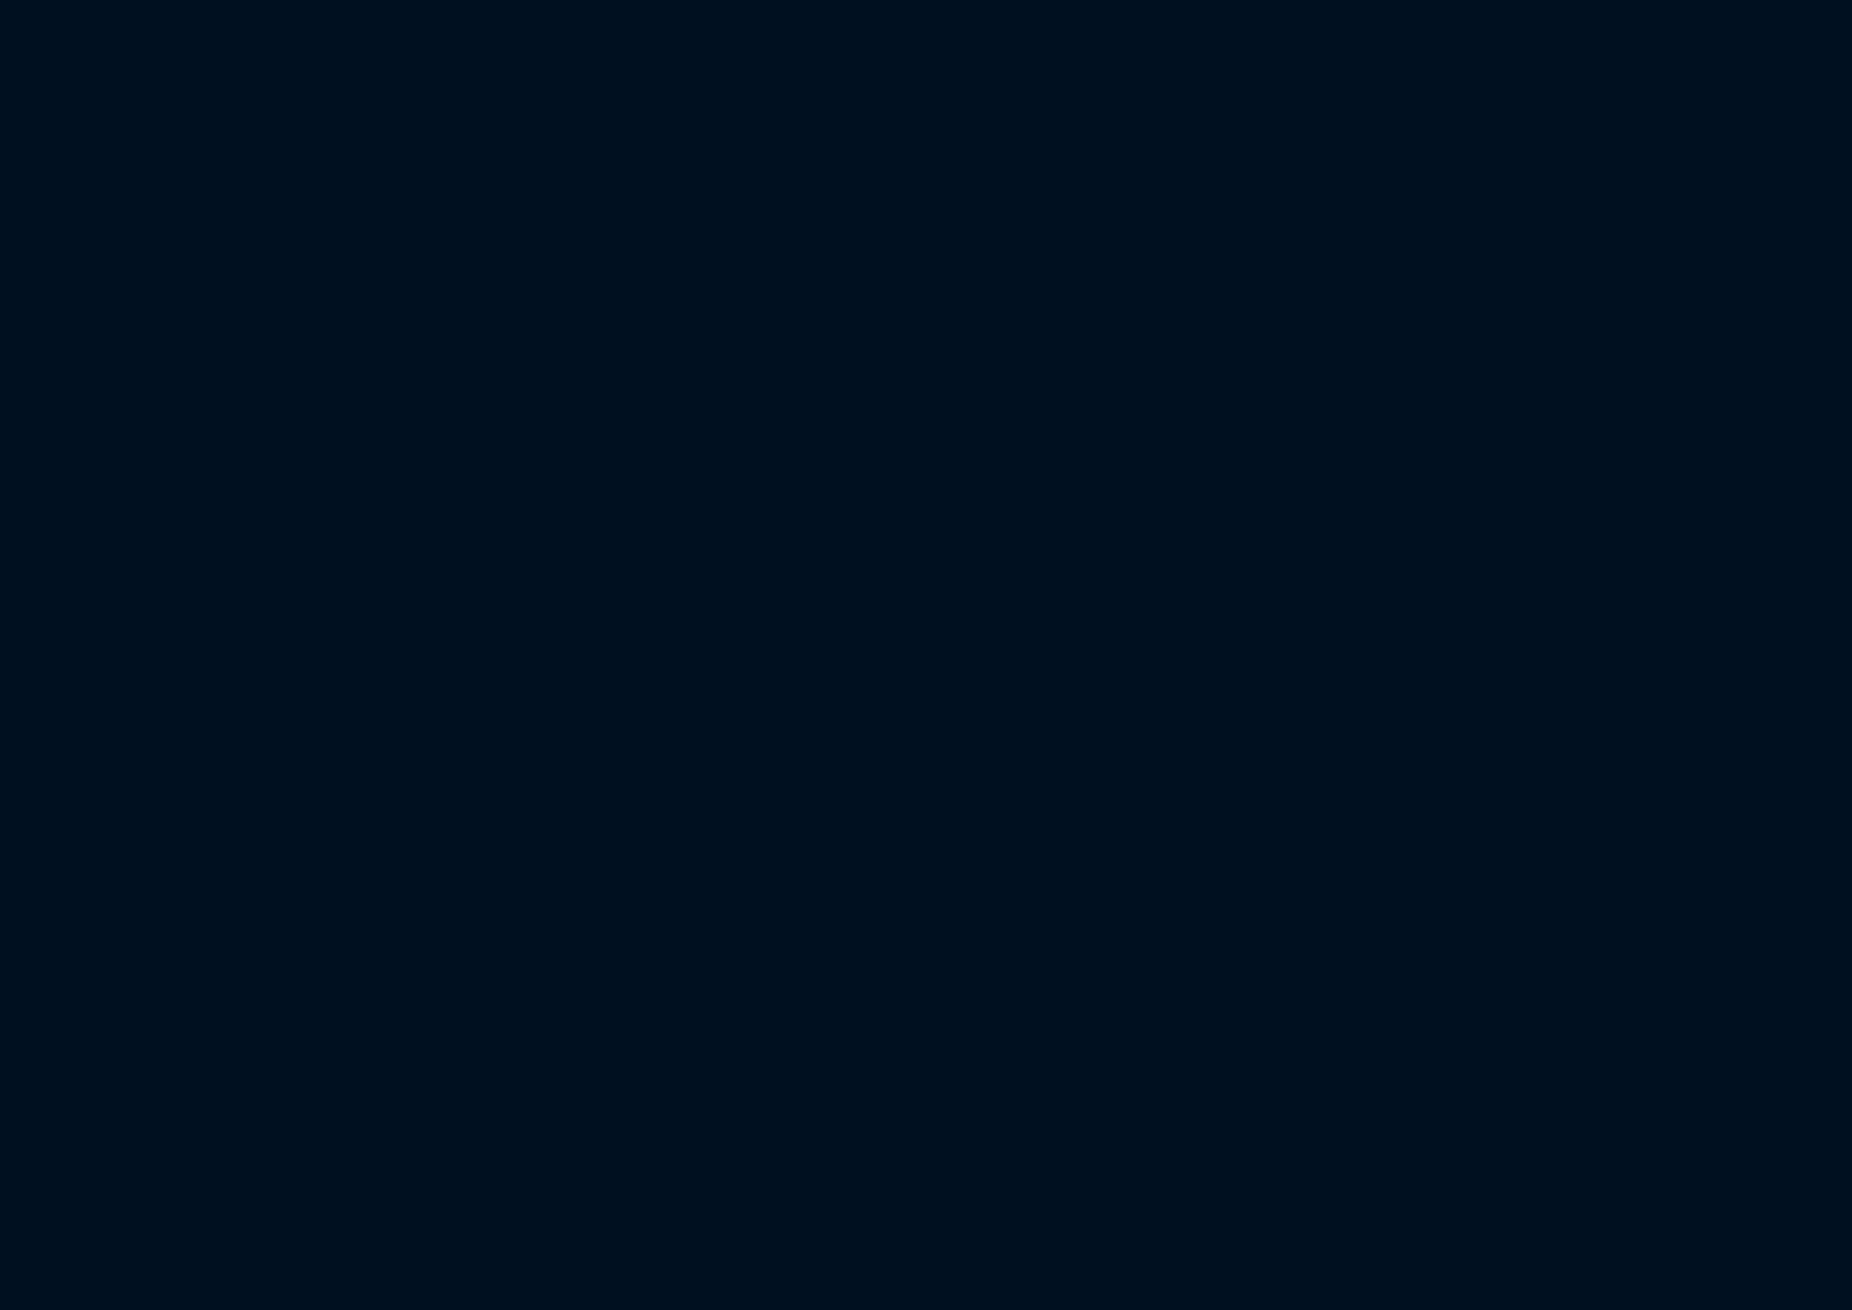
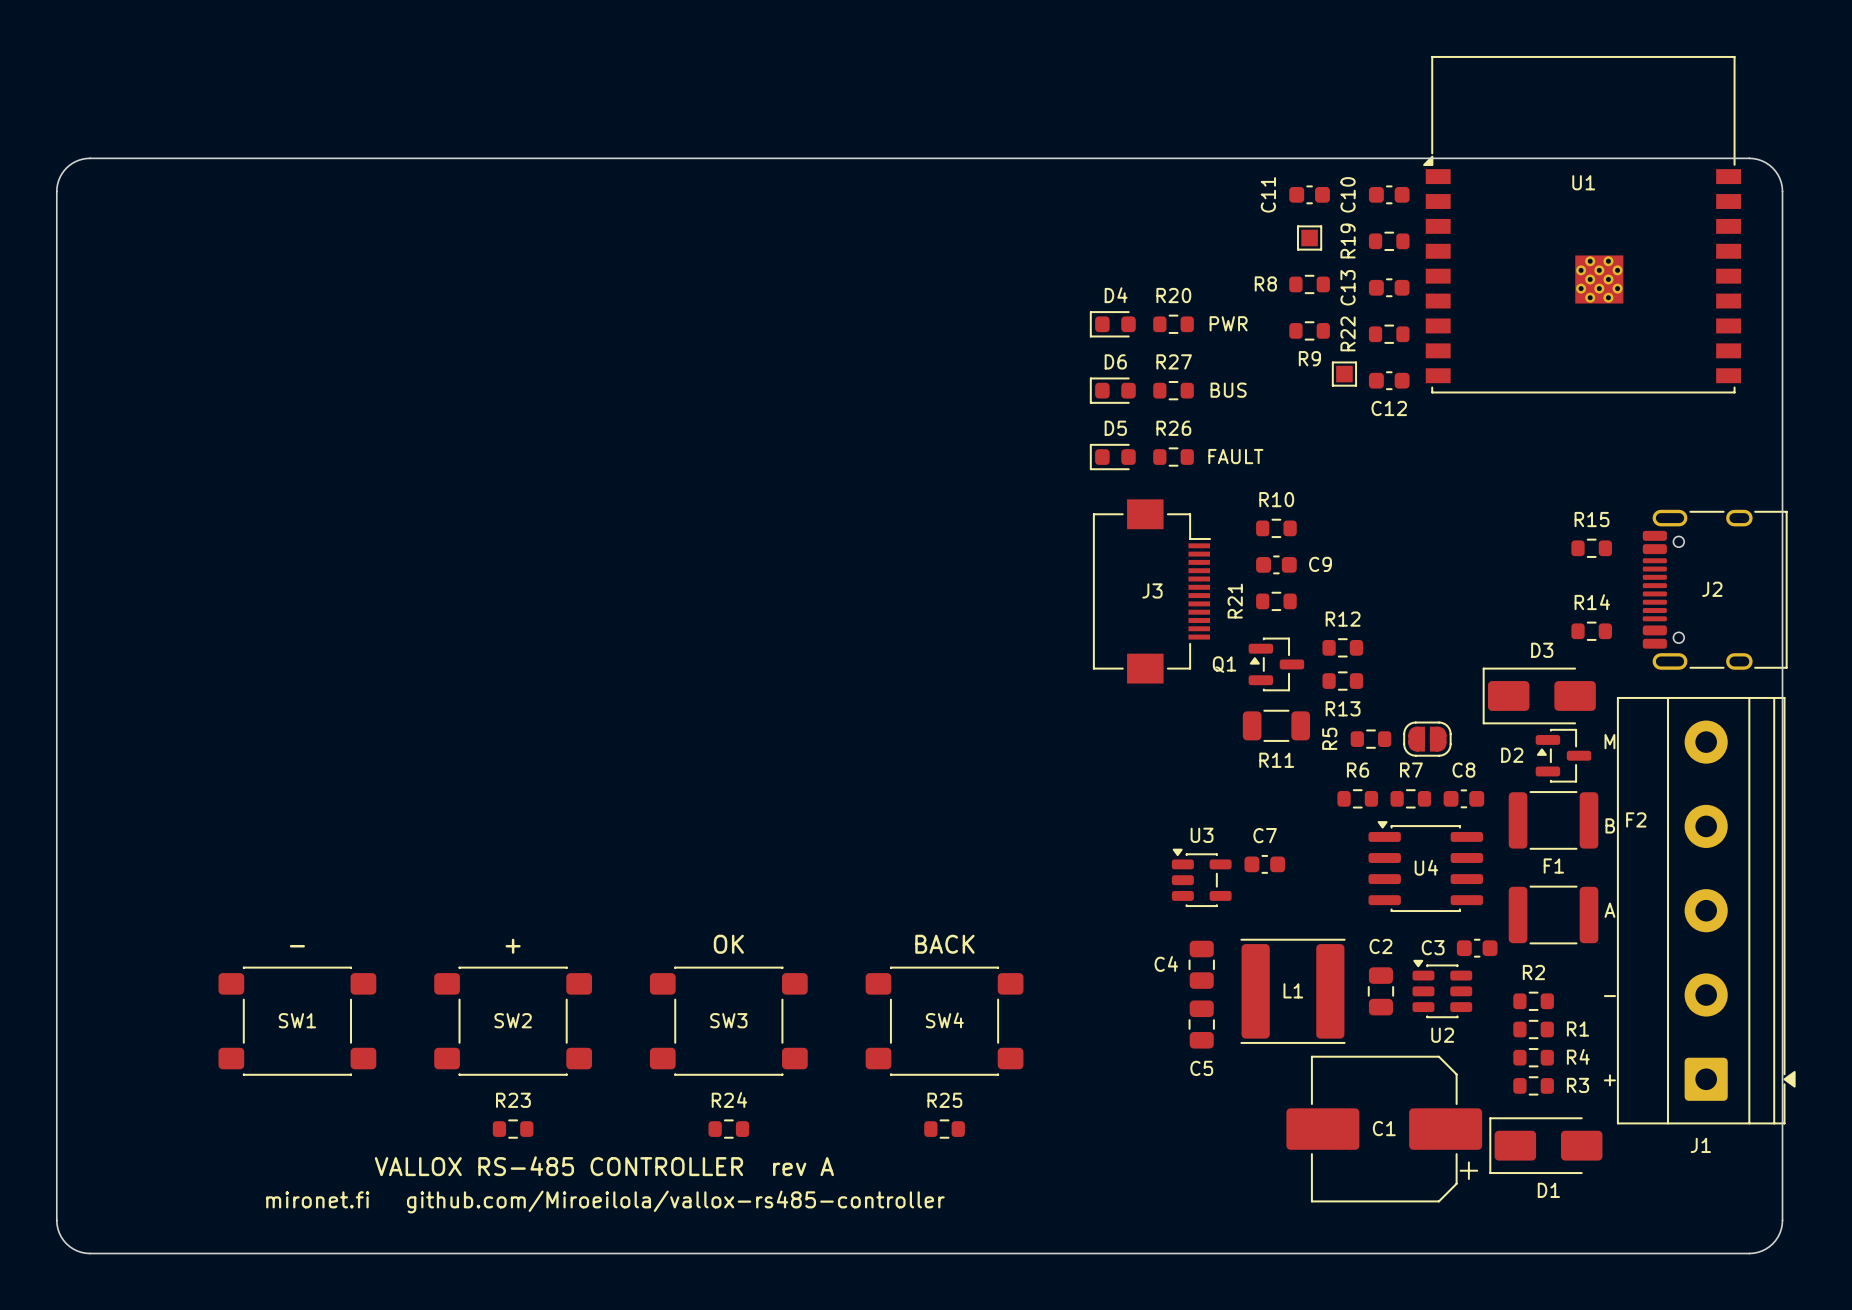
board edge: none -> (89, 158) (1749, 158) (1765, 162) (1778, 174) (1782, 191) (1782, 1220) (1778, 1236) (1765, 1249) (1749, 1253) (89, 1253) (73, 1249) (61, 1236) (56, 1220) (56, 191) (58, 180) (66, 168) (75, 161) (89, 158)
C11: none -> (1309, 194)
C10: none -> (1389, 194)
U1: none -> (1582, 224)
part: none -> (1309, 238)
R19: none -> (1389, 241)
R8: none -> (1309, 284)
C13: none -> (1389, 287)
text: none -> PWR (1228, 323)
D4: none -> (1112, 324)
R20: none -> (1173, 324)
R9: none -> (1309, 330)
R22: none -> (1389, 334)
part: none -> (1344, 374)
C12: none -> (1389, 380)
D6: none -> (1112, 390)
R27: none -> (1173, 390)
text: none -> BUS (1228, 390)
text: none -> FAULT (1235, 456)
D5: none -> (1112, 457)
R26: none -> (1173, 457)
R10: none -> (1276, 528)
R15: none -> (1591, 548)
C9: none -> (1276, 564)
J2: none -> (1715, 589)
J3: none -> (1151, 591)
R21: none -> (1276, 601)
R14: none -> (1591, 631)
R12: none -> (1342, 647)
Q1: none -> (1276, 664)
R13: none -> (1342, 681)
D3: none -> (1539, 695)
R11: none -> (1276, 725)
R5: none -> (1370, 739)
part: none -> (1427, 739)
text: none -> M (1609, 741)
D2: none -> (1563, 755)
R6: none -> (1357, 798)
R7: none -> (1410, 798)
C8: none -> (1463, 798)
F2: none -> (1553, 820)
text: none -> B (1610, 825)
C7: none -> (1264, 864)
U4: none -> (1425, 866)
U3: none -> (1201, 877)
text: none -> A (1609, 910)
J1: none -> (1706, 910)
F1: none -> (1553, 915)
text: none -> OK (728, 944)
text: none -> BACK (944, 944)
text: none -> - (297, 946)
text: none -> + (513, 946)
C3: none -> (1477, 948)
C4: none -> (1201, 964)
U2: none -> (1442, 989)
L1: none -> (1293, 991)
C2: none -> (1380, 991)
text: none -> - (1609, 996)
R2: none -> (1533, 1001)
SW1: none -> (297, 1021)
SW2: none -> (513, 1021)
SW3: none -> (728, 1021)
SW4: none -> (944, 1021)
C5: none -> (1201, 1024)
R1: none -> (1533, 1029)
R4: none -> (1533, 1057)
text: none -> + (1609, 1080)
R3: none -> (1533, 1085)
R23: none -> (513, 1129)
R24: none -> (728, 1129)
R25: none -> (944, 1129)
C1: none -> (1384, 1129)
D1: none -> (1545, 1145)
text: none -> VALLOX RS-485 CONTROLLER rev A (604, 1166)
text: none -> mironet.fi github.com/Miroeilola/vallox-rs485-controller (605, 1201)

